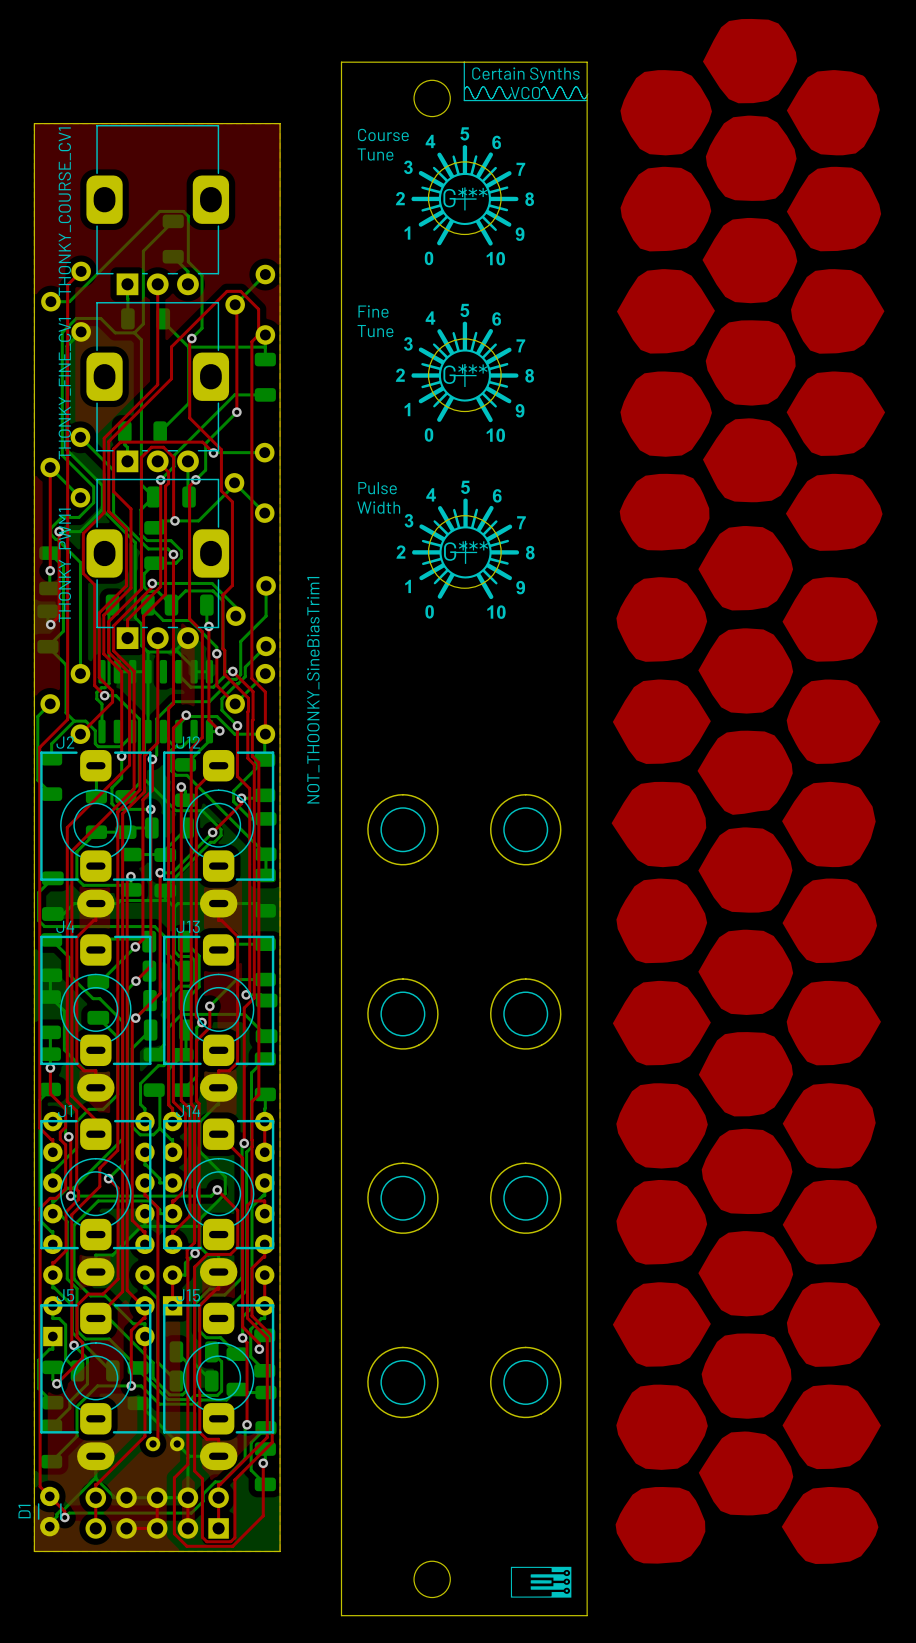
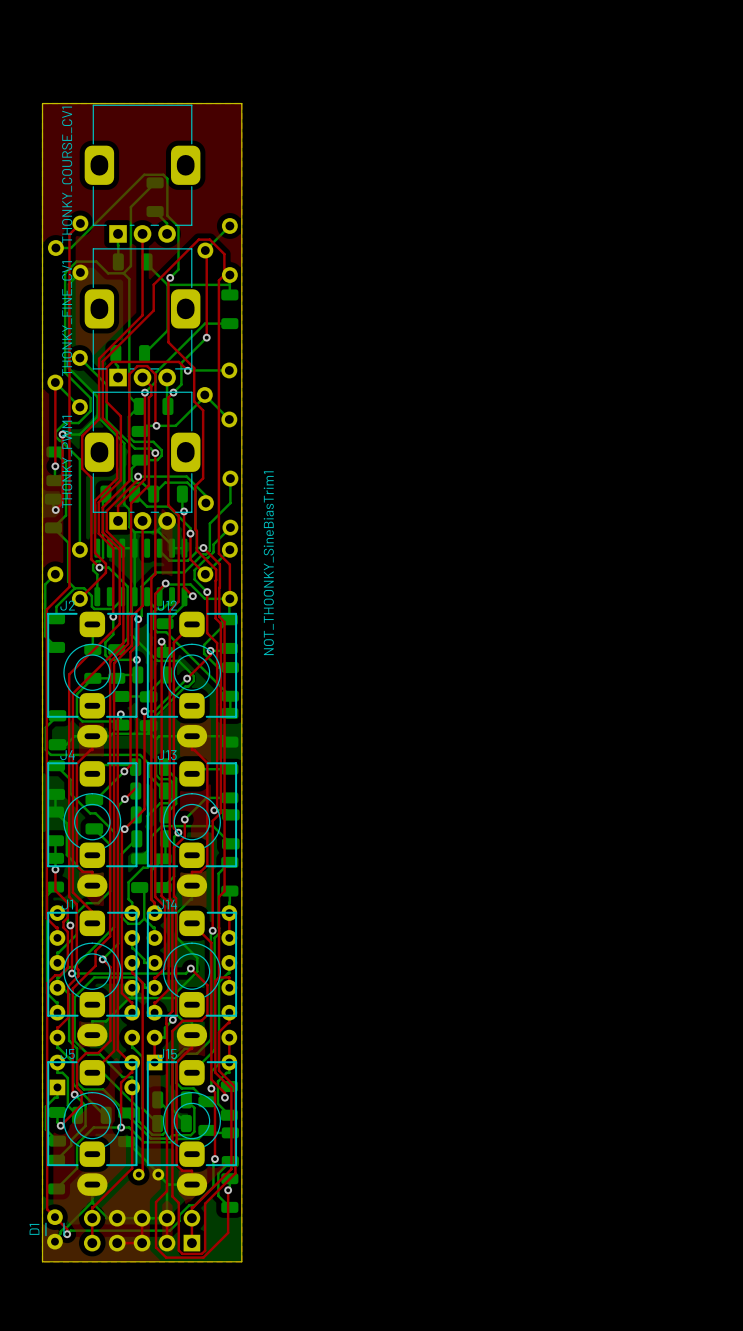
drawing: [611, 18, 886, 1565] -> none
board edge: (341, 62) (587, 62) (587, 1615) (341, 1615) (341, 62) -> none
line: (464, 62) (464, 100) (587, 100) -> none
text: Certain Synths (525, 75) -> none
round board edge: [413, 79, 451, 118] -> none
drawing: [463, 86, 512, 100] -> none
drawing: [540, 86, 589, 100] -> none
text: VCO (525, 93) -> none
text: Course (383, 134) -> none
text: Tune (375, 154) -> none
drawing: [427, 161, 502, 236] -> none
G***: (464, 196) -> none
text: Fine (373, 311) -> none
text: Tune (375, 331) -> none
drawing: [427, 338, 502, 413] -> none
G***: (464, 372) -> none
text: Pulse (377, 488) -> none
text: Width (378, 507) -> none
drawing: [427, 515, 502, 589] -> none
G***: (465, 549) -> none
drawing: [367, 794, 439, 866] -> none
drawing: [490, 794, 562, 866] -> none
drawing: [367, 978, 439, 1050] -> none
drawing: [490, 978, 562, 1050] -> none
drawing: [367, 1162, 439, 1234] -> none
drawing: [490, 1162, 562, 1234] -> none
drawing: [367, 1346, 439, 1419] -> none
drawing: [490, 1346, 562, 1419] -> none
round board edge: [413, 1560, 451, 1599] -> none
drawing: [510, 1566, 572, 1598] -> none

